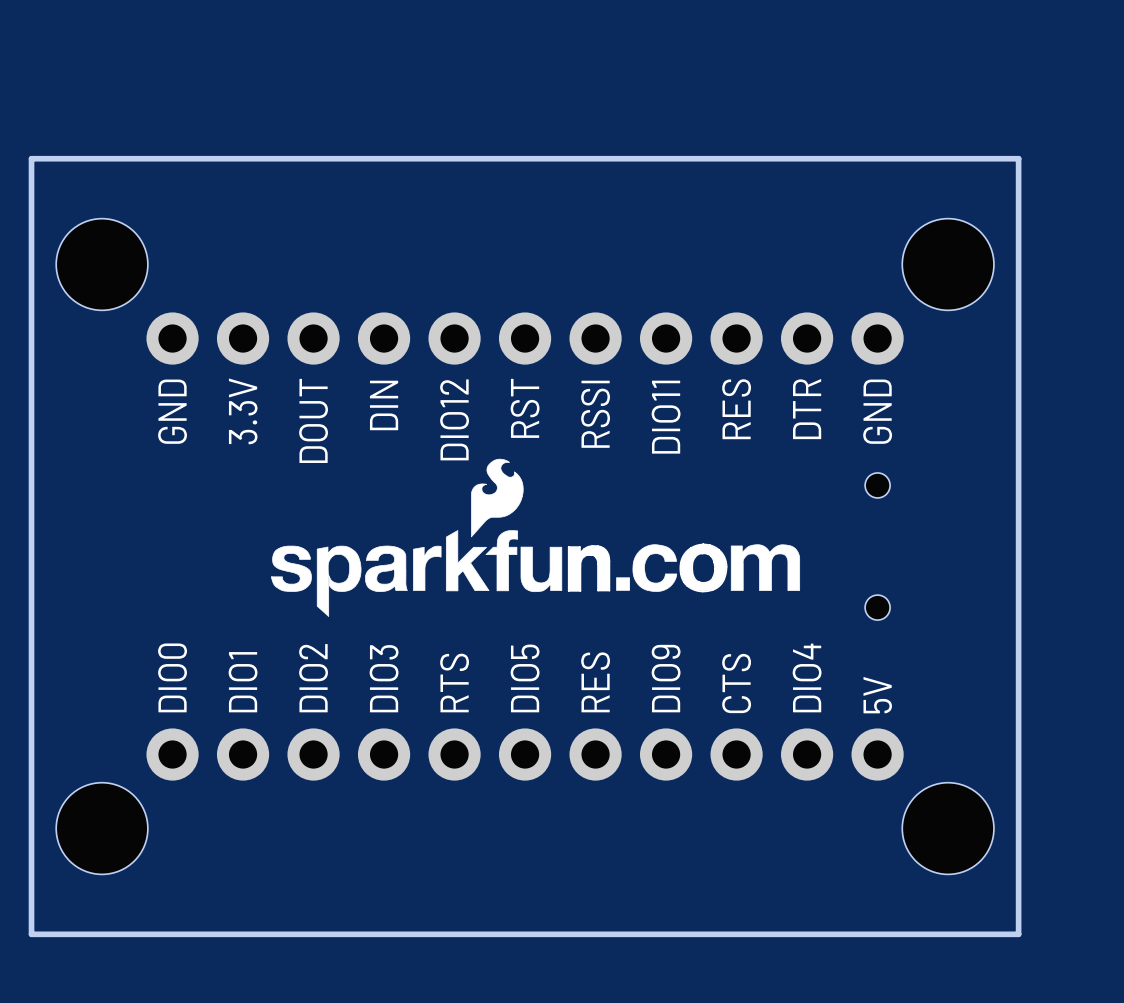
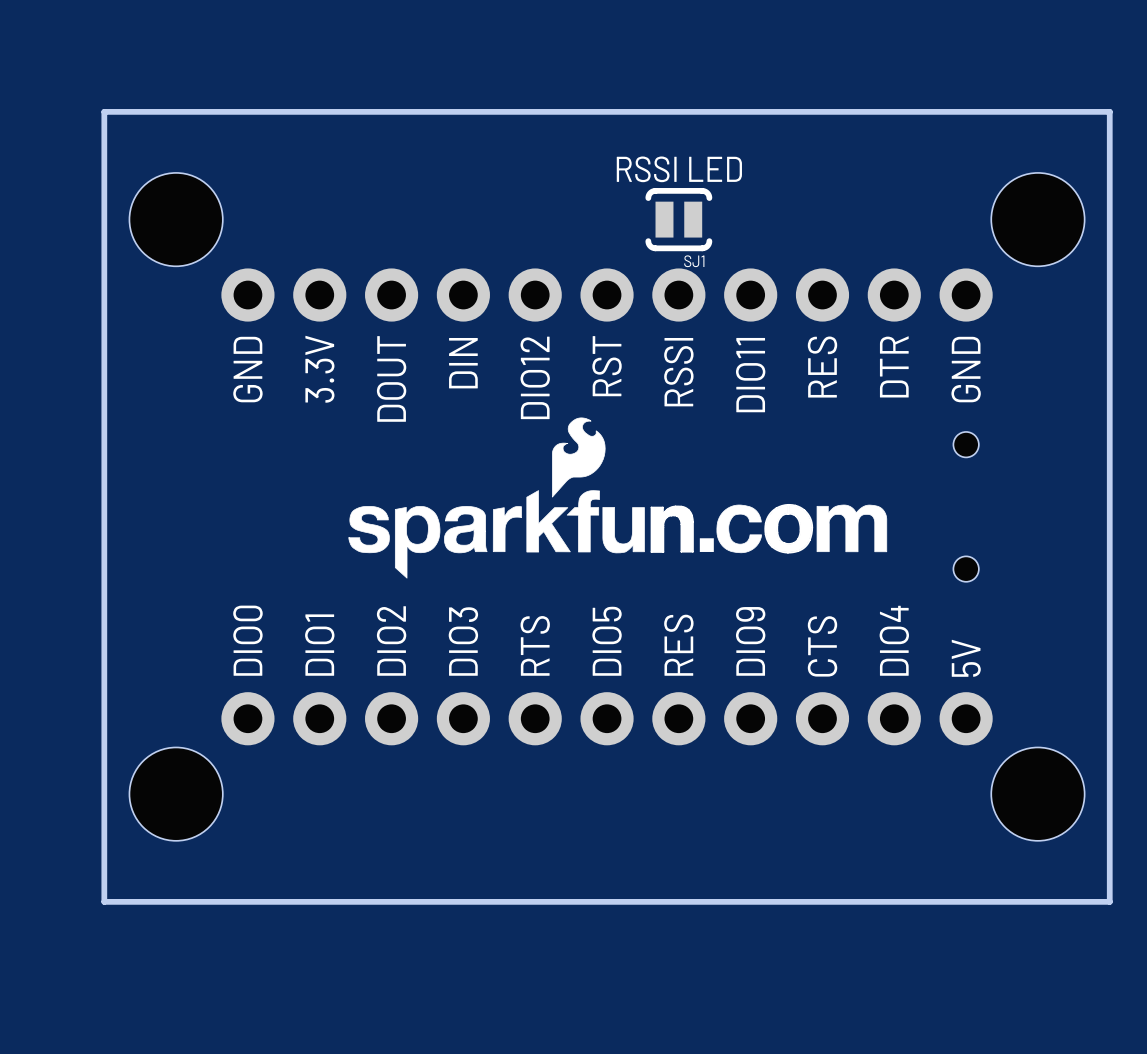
text: none -> RSSI LED (679, 169)
SJ1: none -> (678, 219)

